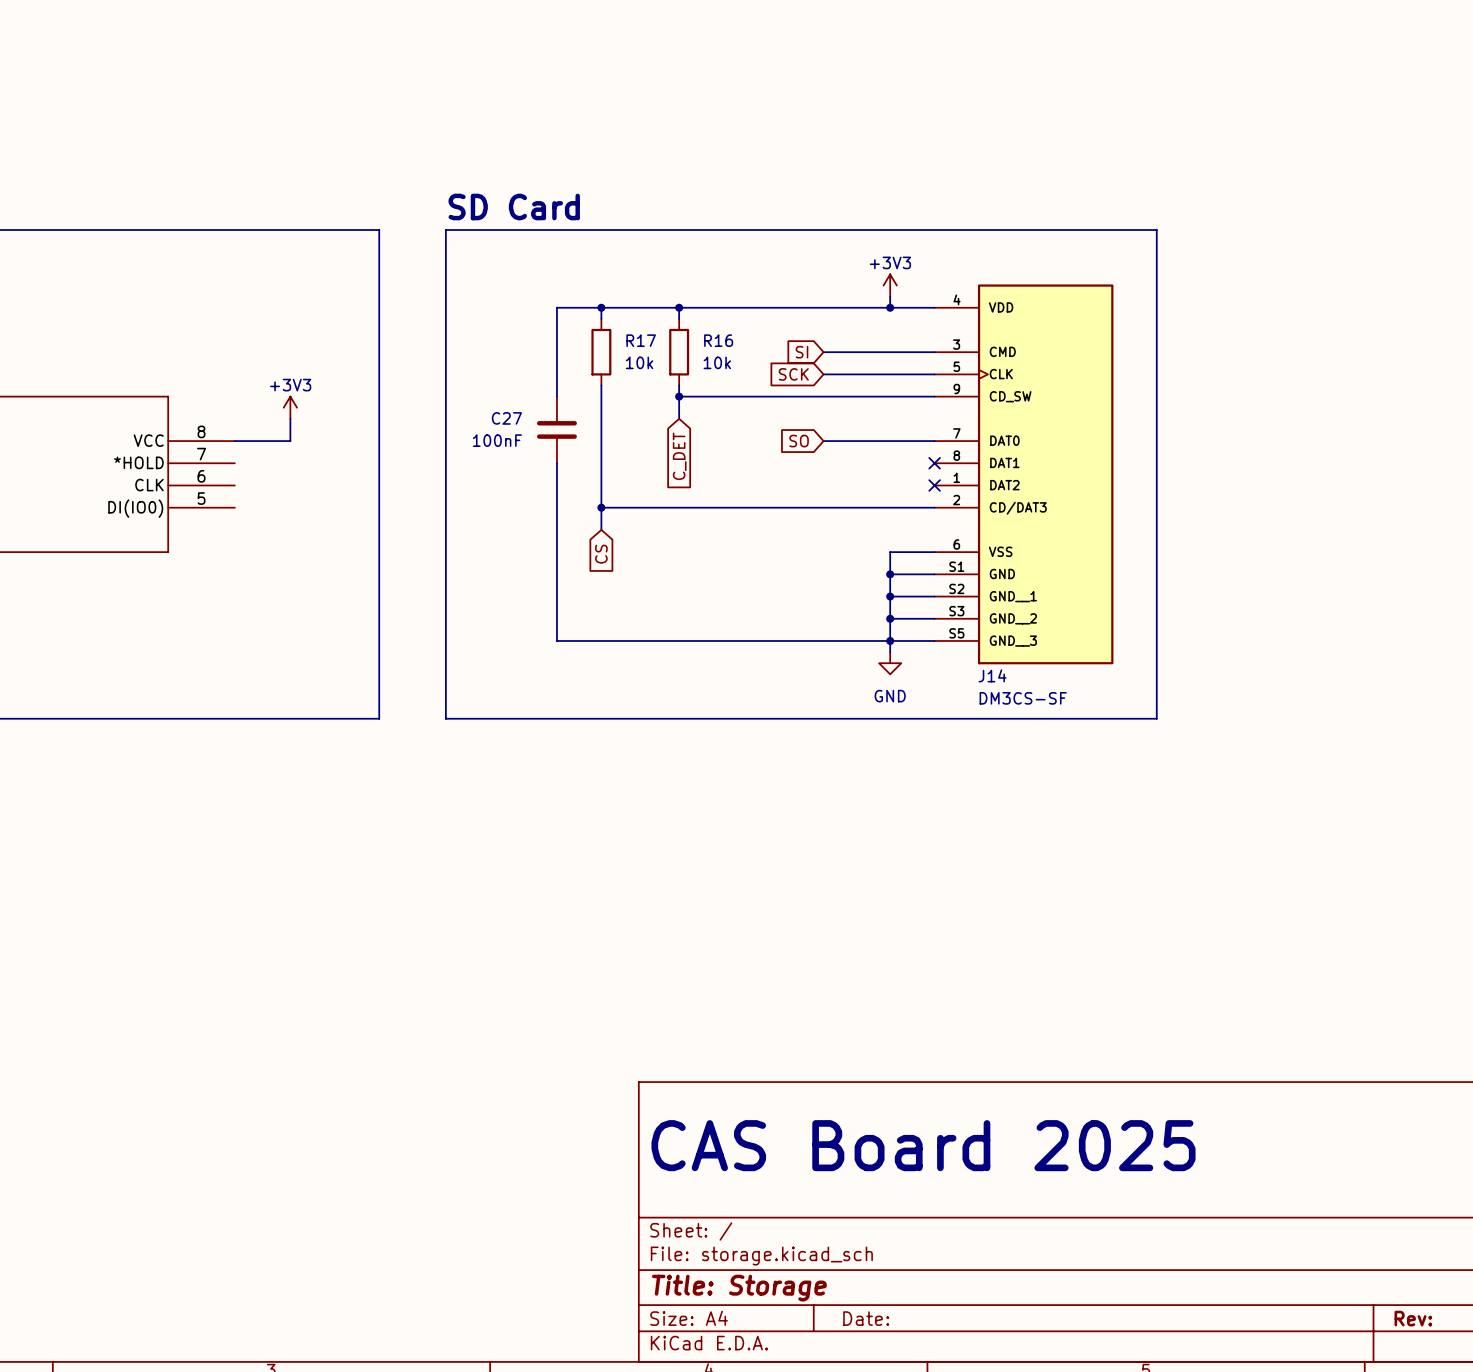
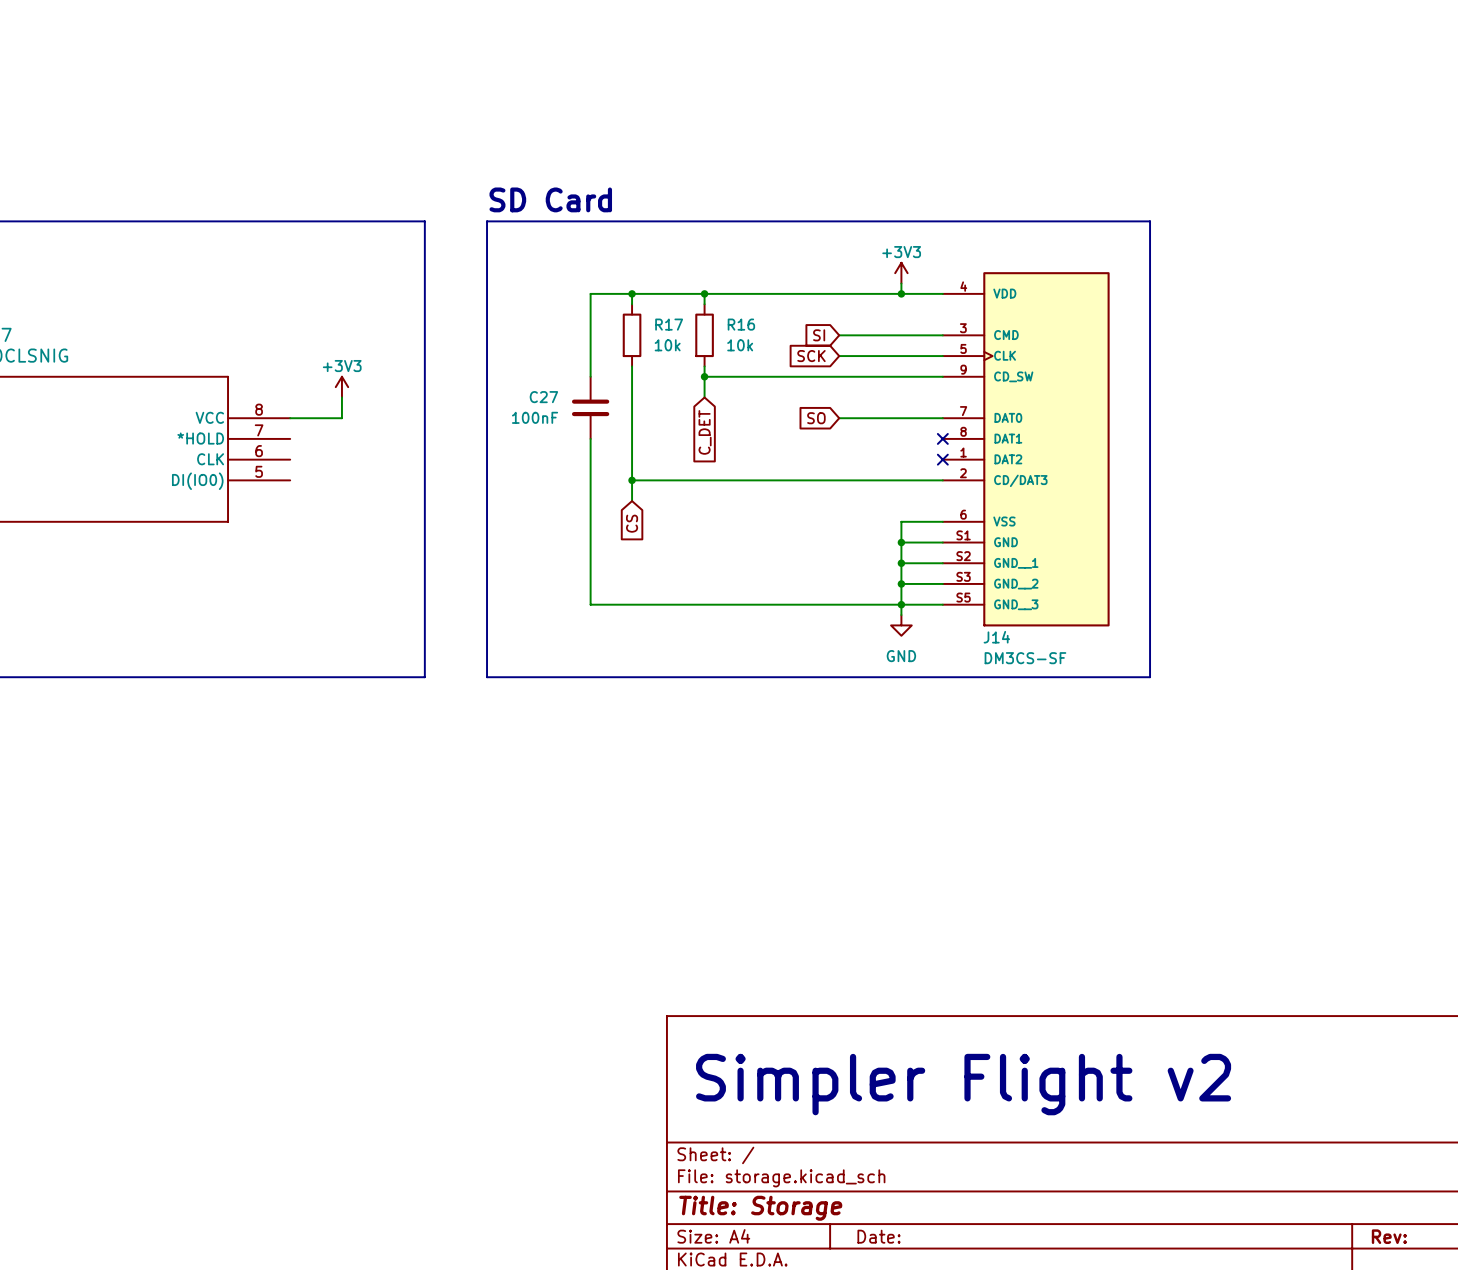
text: CAS Board 2025 (923, 1145) -> none
text: none -> Simpler Flight v2 (963, 1084)

